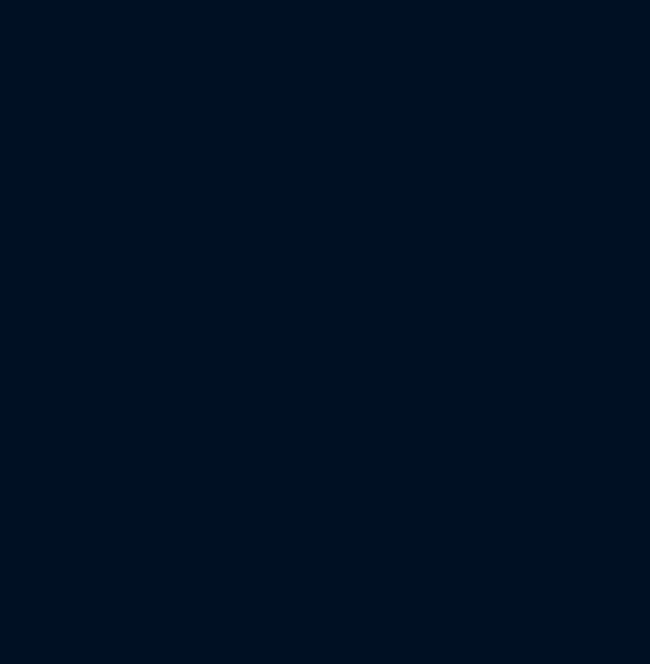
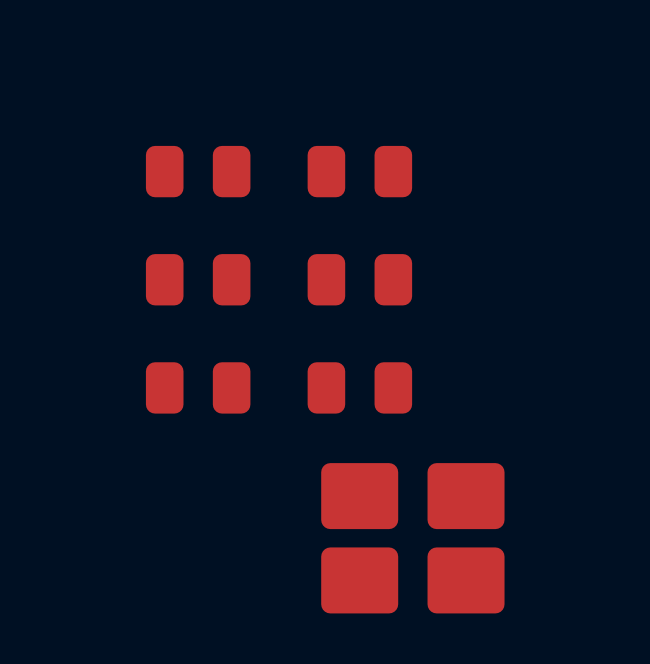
part: none -> (198, 171)
part: none -> (359, 171)
part: none -> (198, 279)
part: none -> (359, 279)
part: none -> (198, 387)
part: none -> (359, 387)
part: none -> (412, 538)

